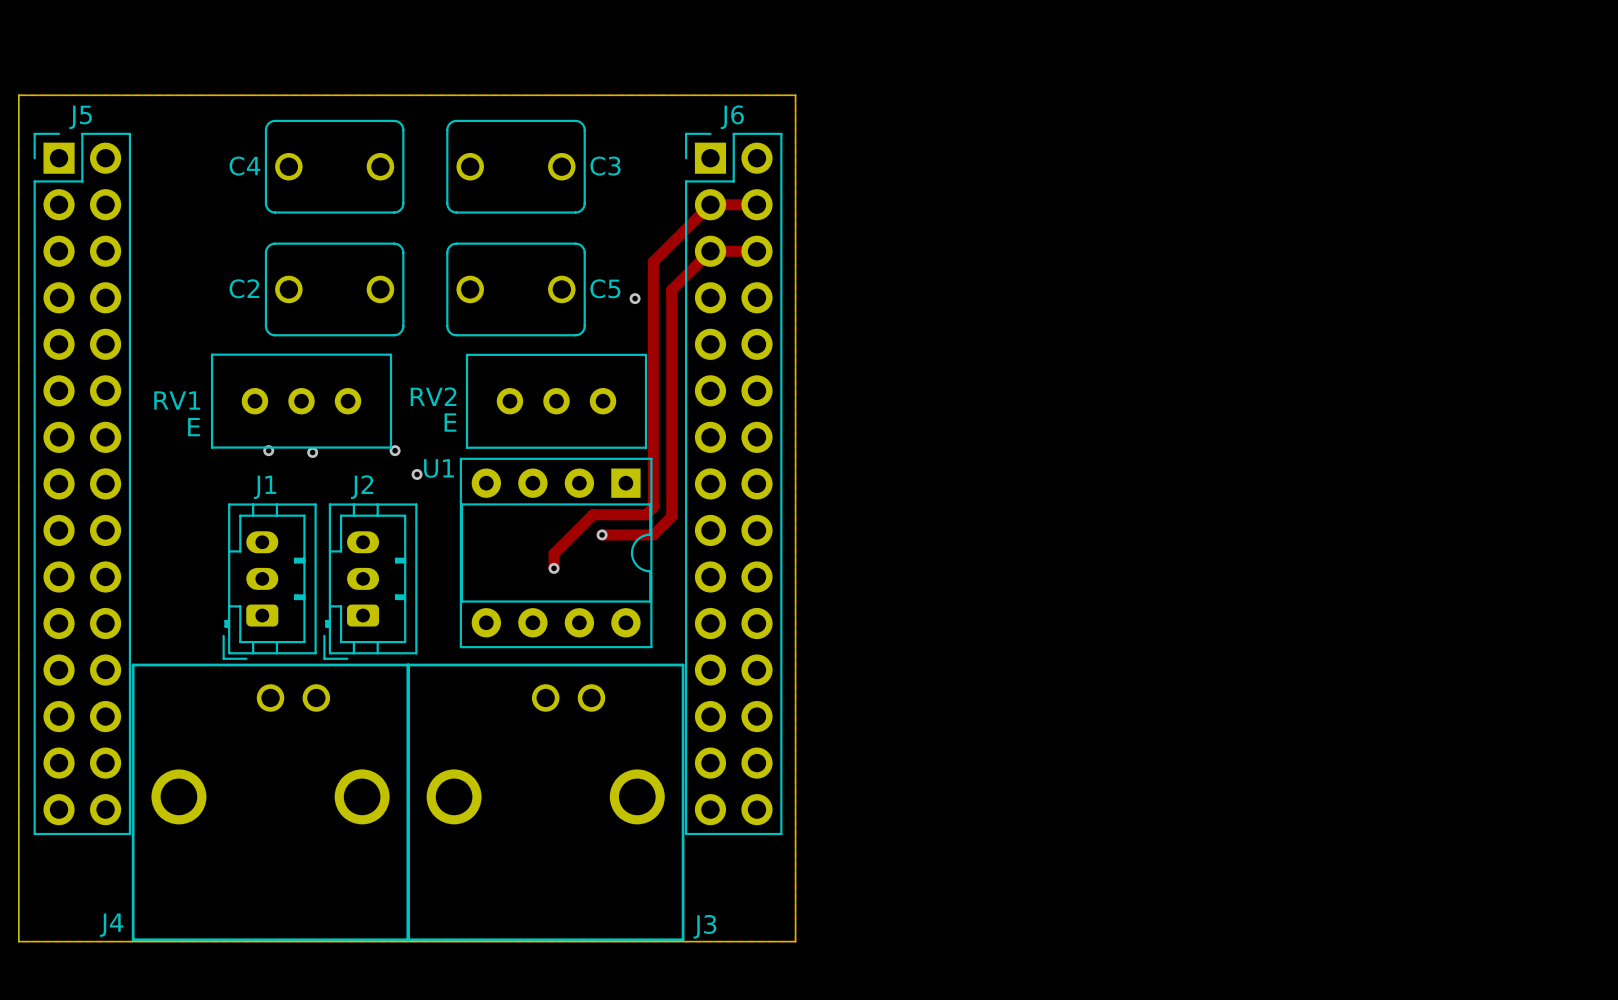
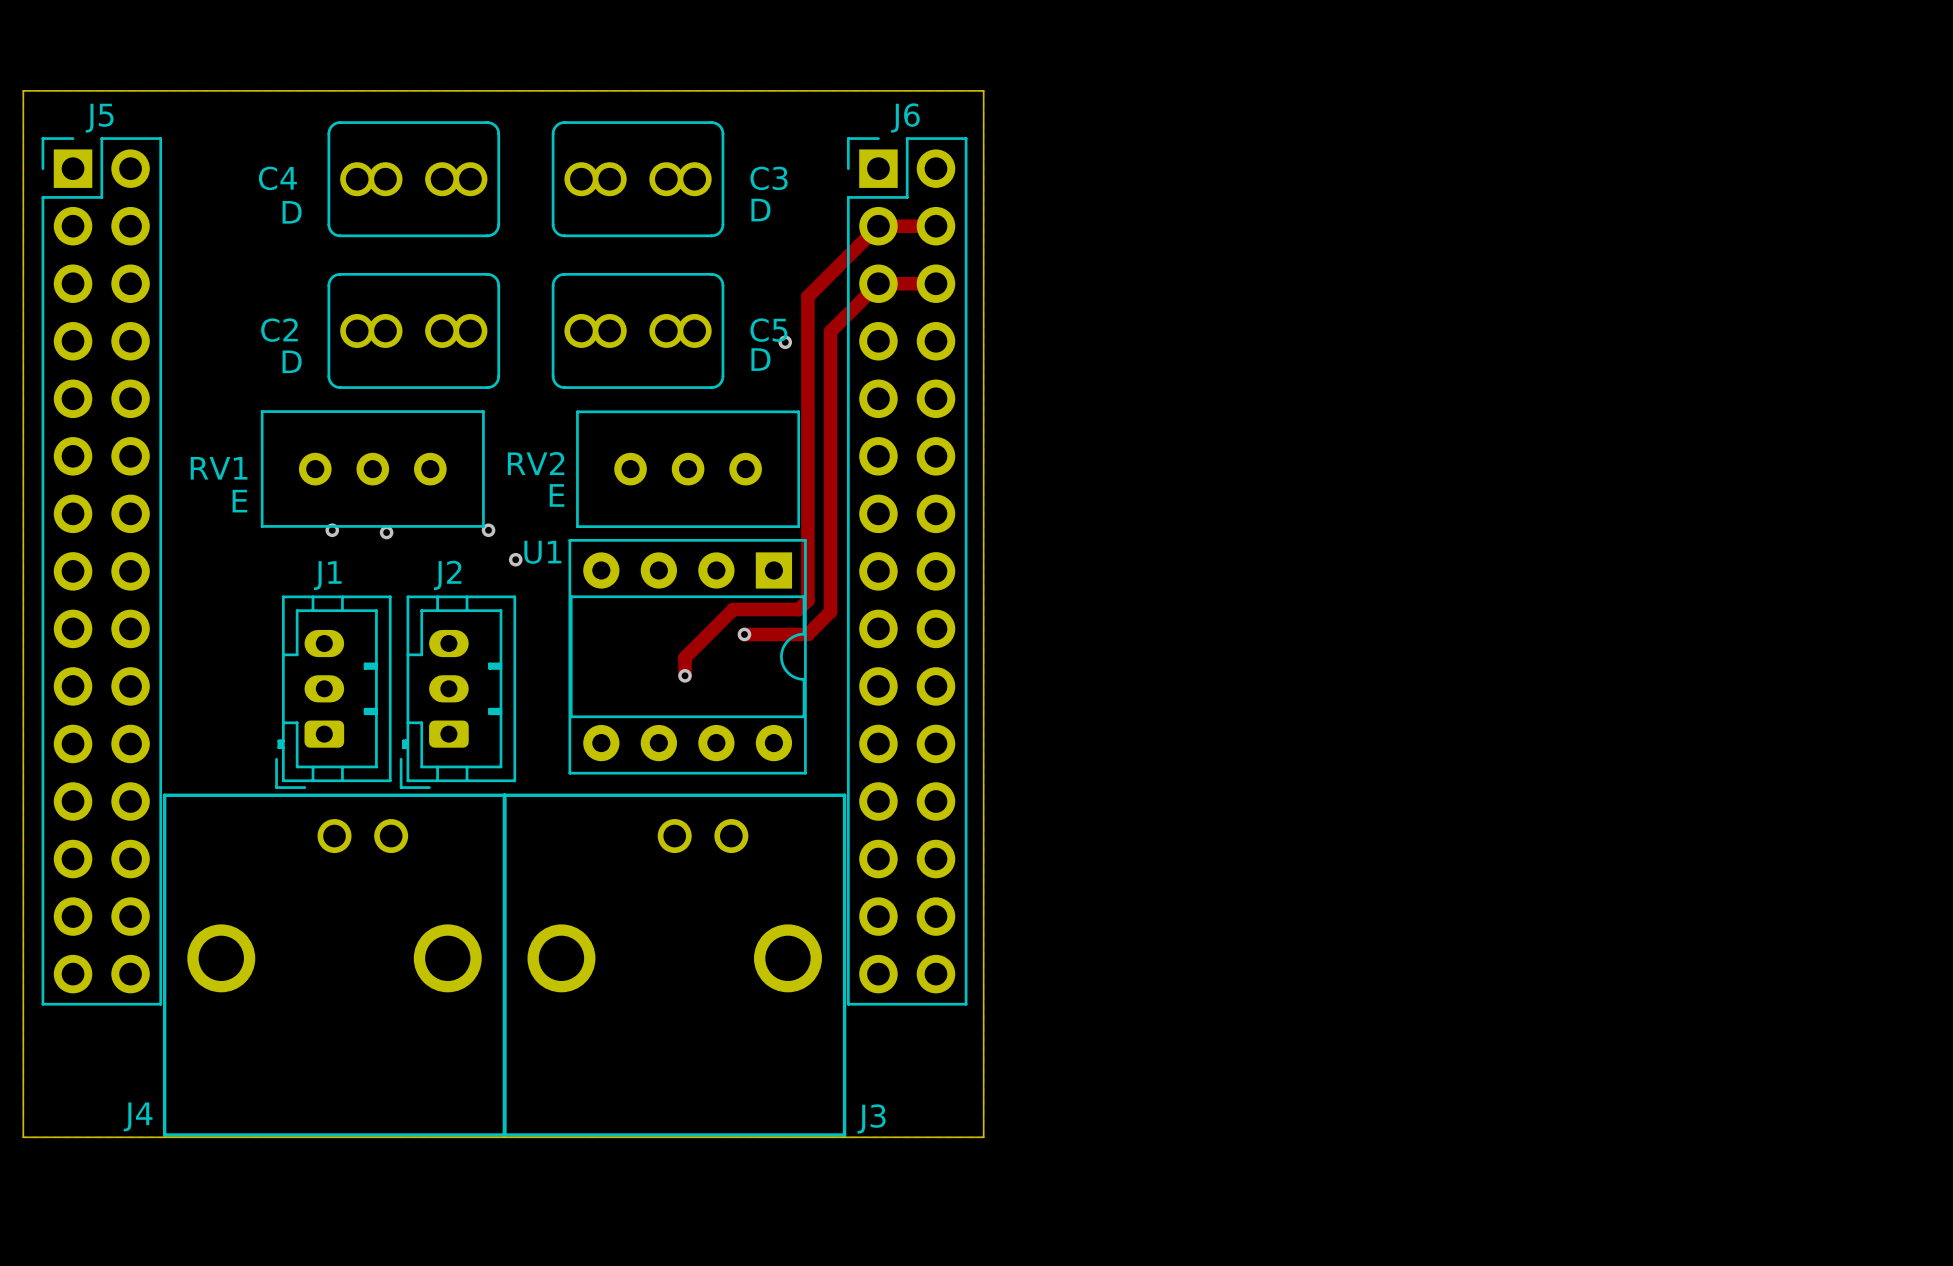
C4 footprint: [264, 119, 405, 214] -> [327, 121, 501, 238]
C3 footprint: [446, 119, 586, 214] -> [551, 121, 725, 238]
C3 value: none -> D (760, 210)
C4 value: none -> D (292, 212)
C2 footprint: [264, 242, 405, 337] -> [327, 272, 501, 389]
C5 footprint: [446, 242, 586, 337] -> [551, 272, 725, 389]
C5 value: none -> D (760, 359)
C2 value: none -> D (292, 361)

